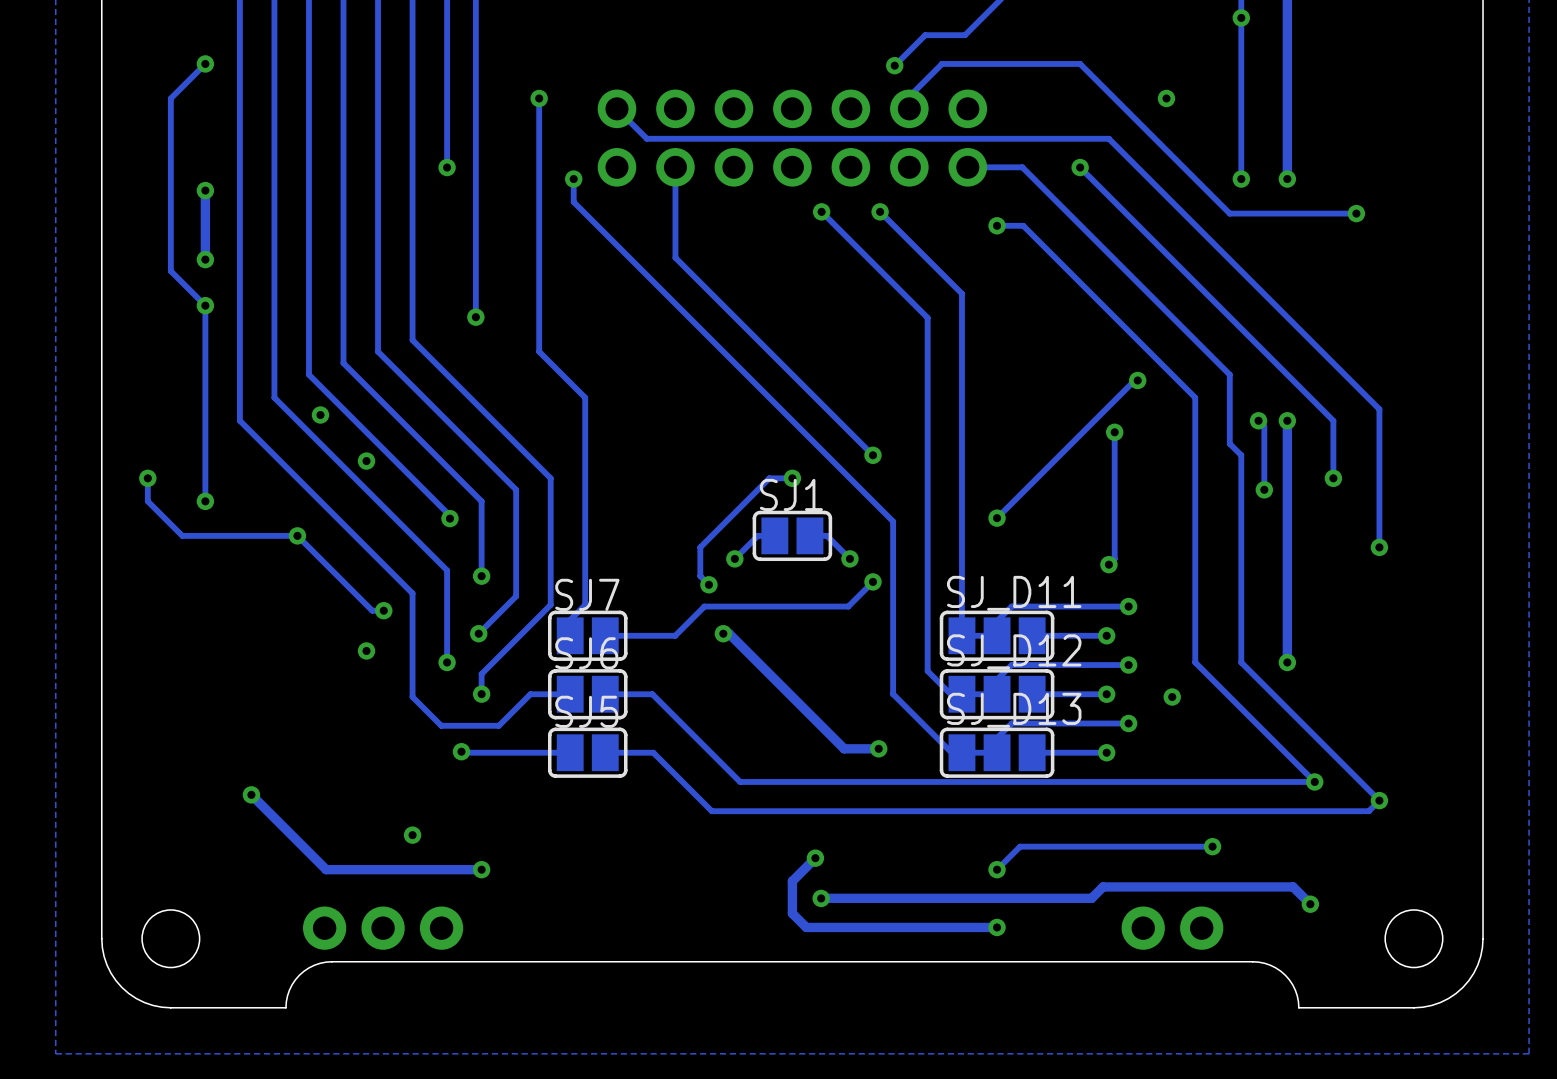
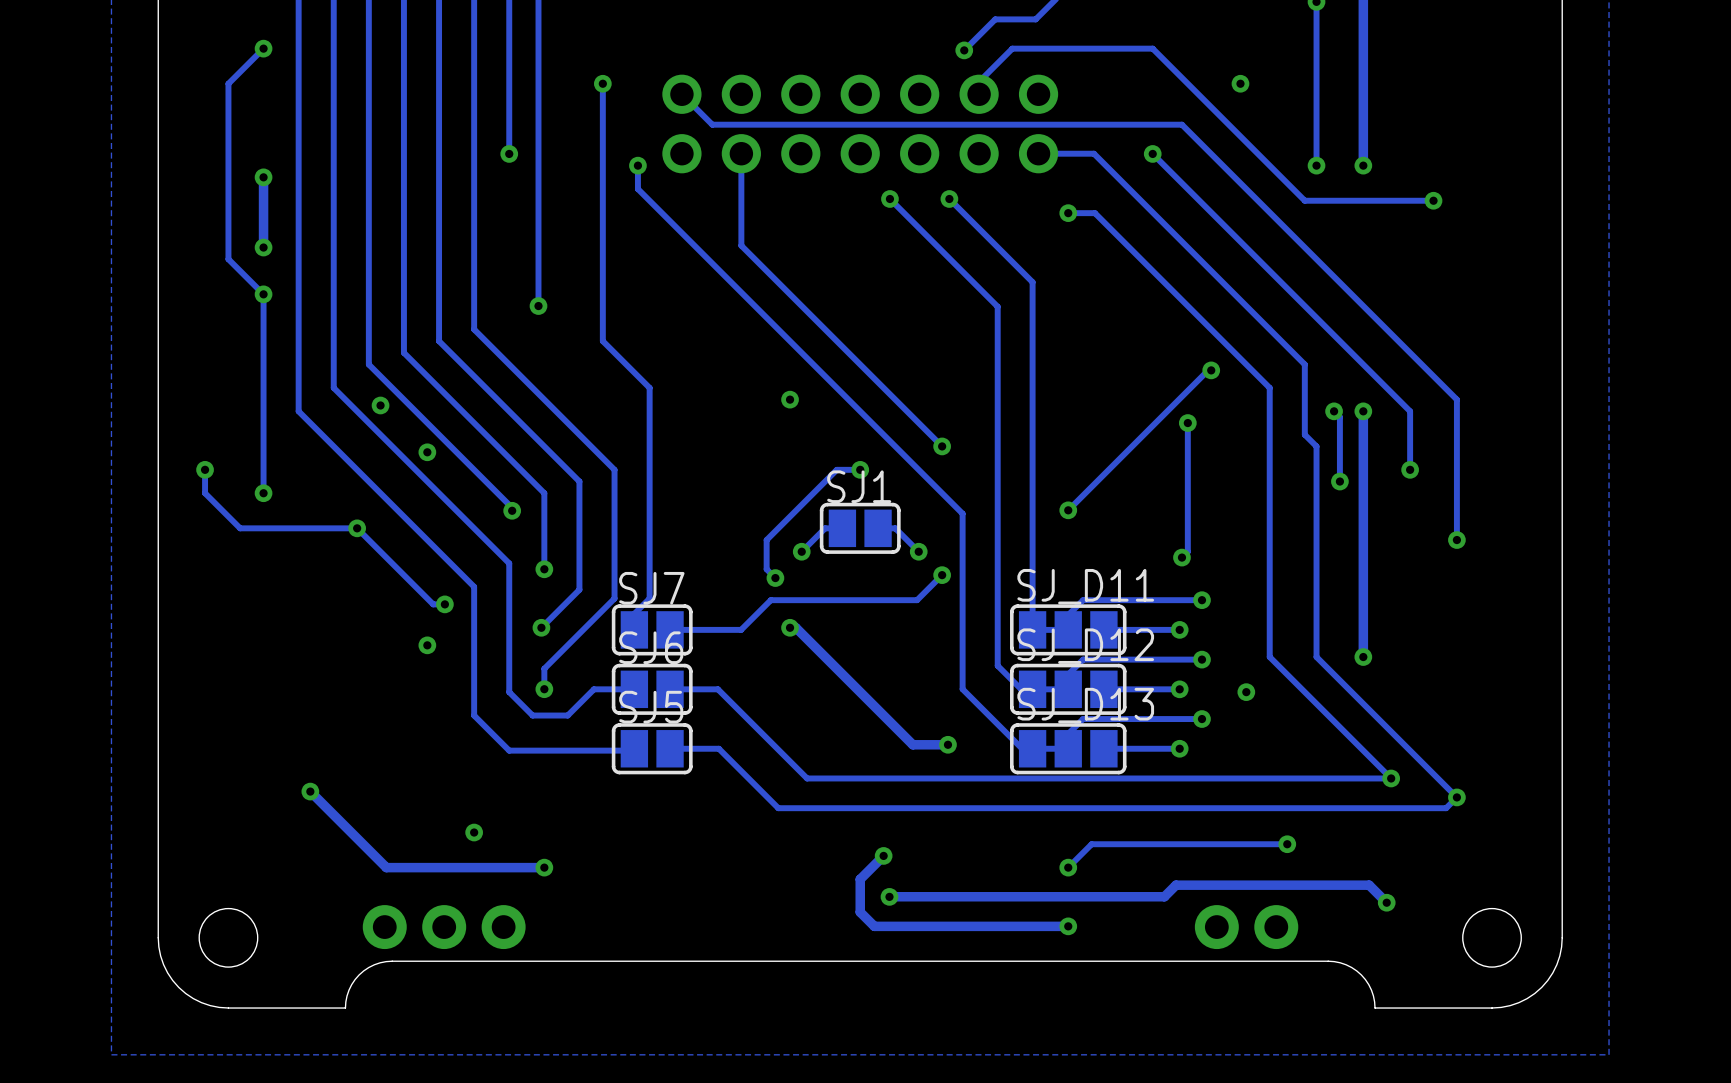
via: none -> (790, 399)
via: (447, 662) -> none
track: (412, 697) (441, 725) (498, 725) (504, 720) -> (509, 657) (509, 692) (532, 715) (567, 715)
track: (461, 751) (570, 752) -> (474, 692) (474, 715) (509, 750) (632, 750) (634, 748)
via: (461, 751) -> none

